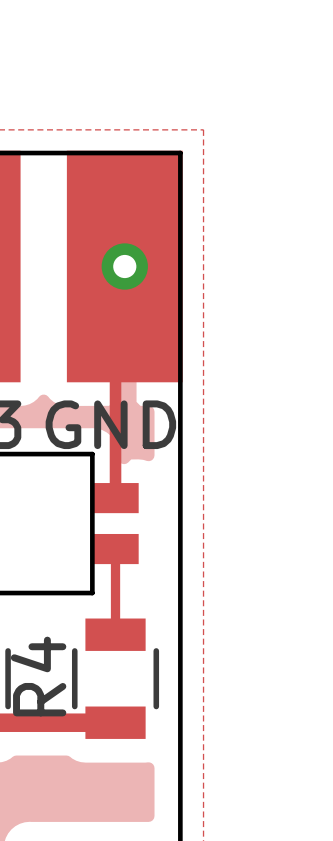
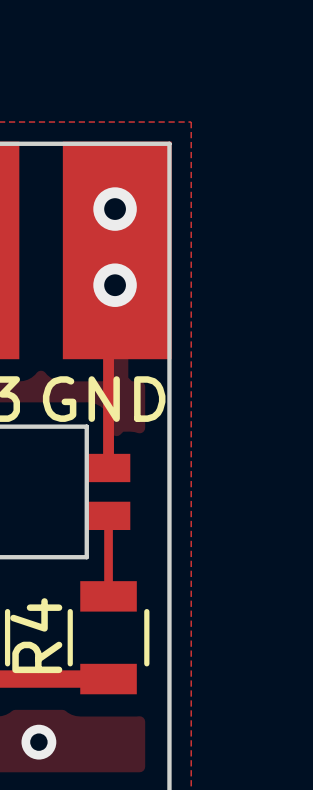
via: none -> (115, 209)
via: (124, 266) -> none
via: none -> (115, 285)
via: none -> (38, 742)

